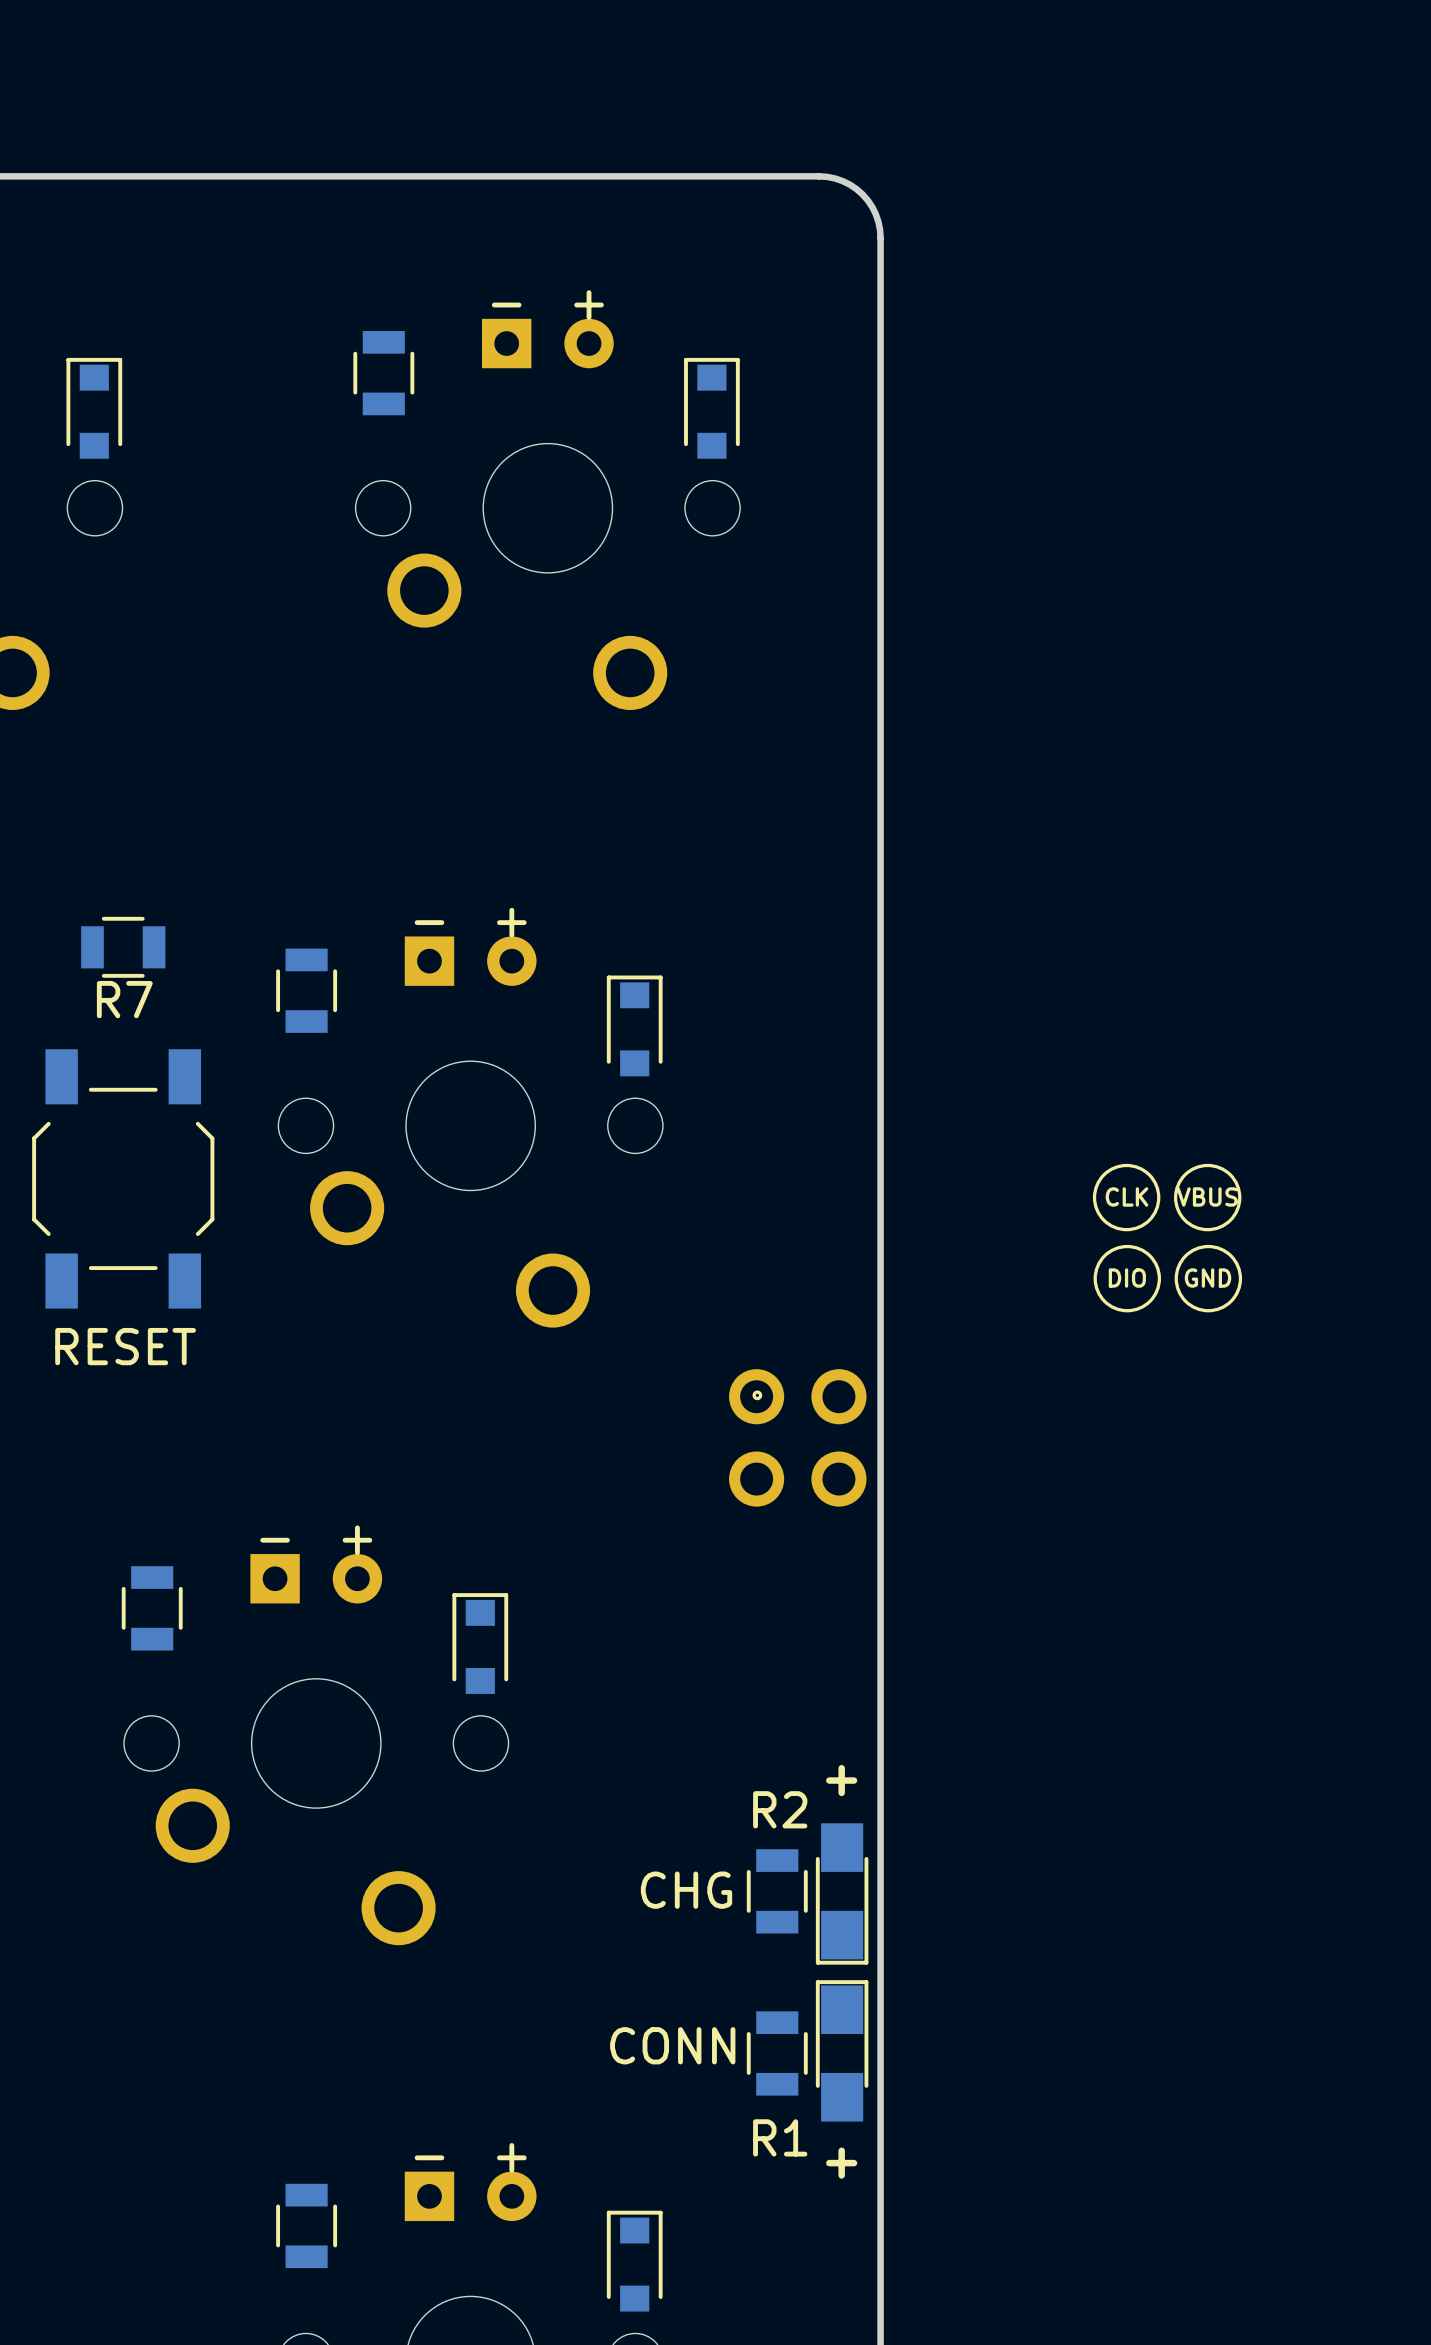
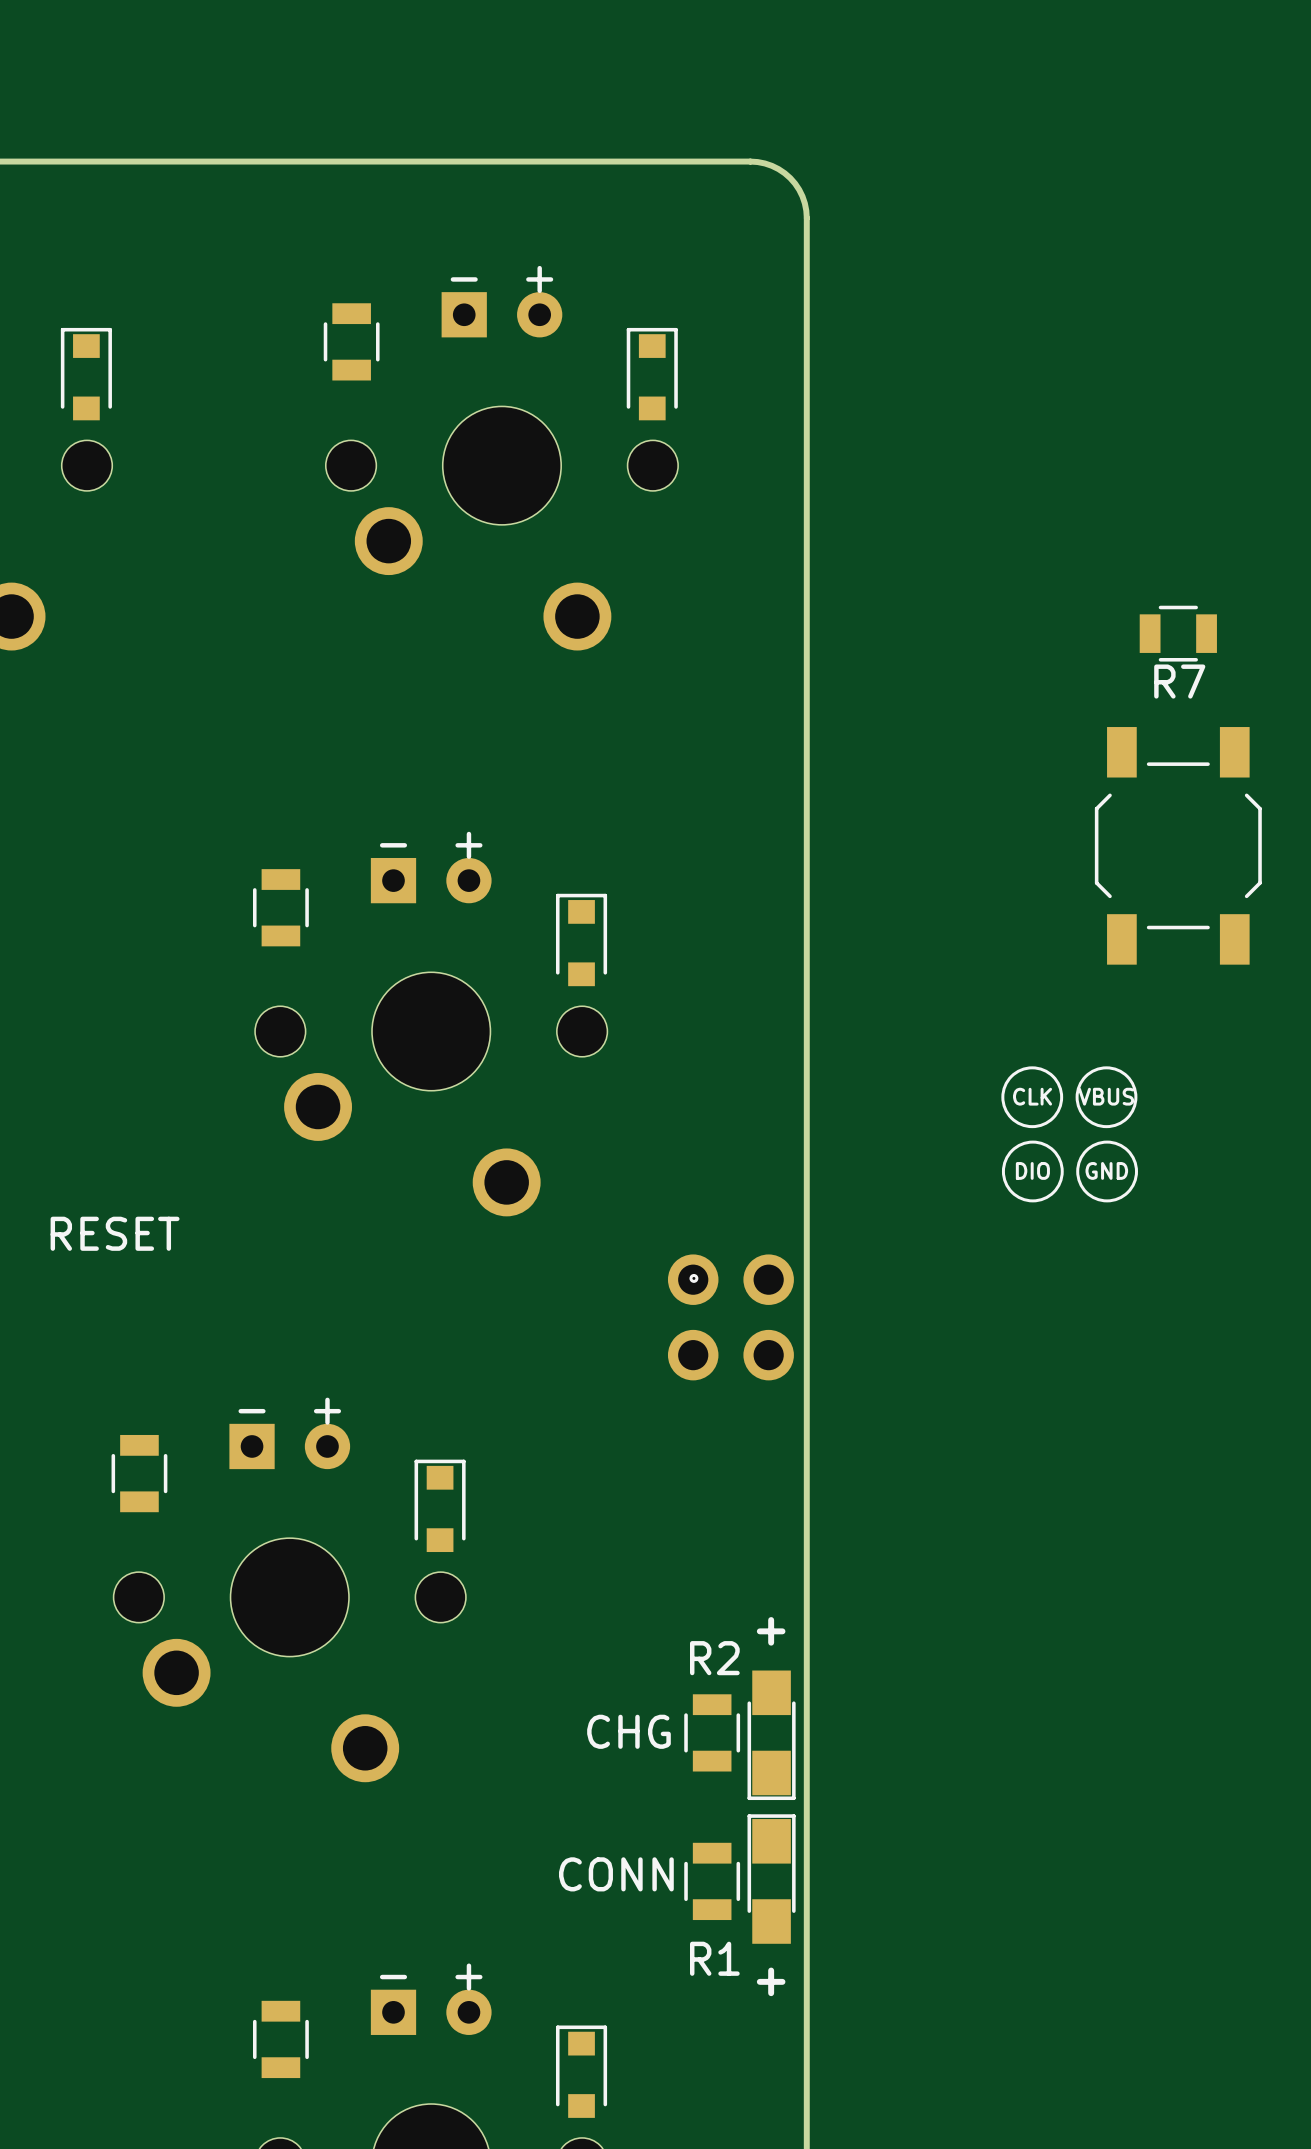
part: none -> (1178, 845)
R7 position: (123, 947) -> (1178, 633)
part: (123, 1178) -> none

